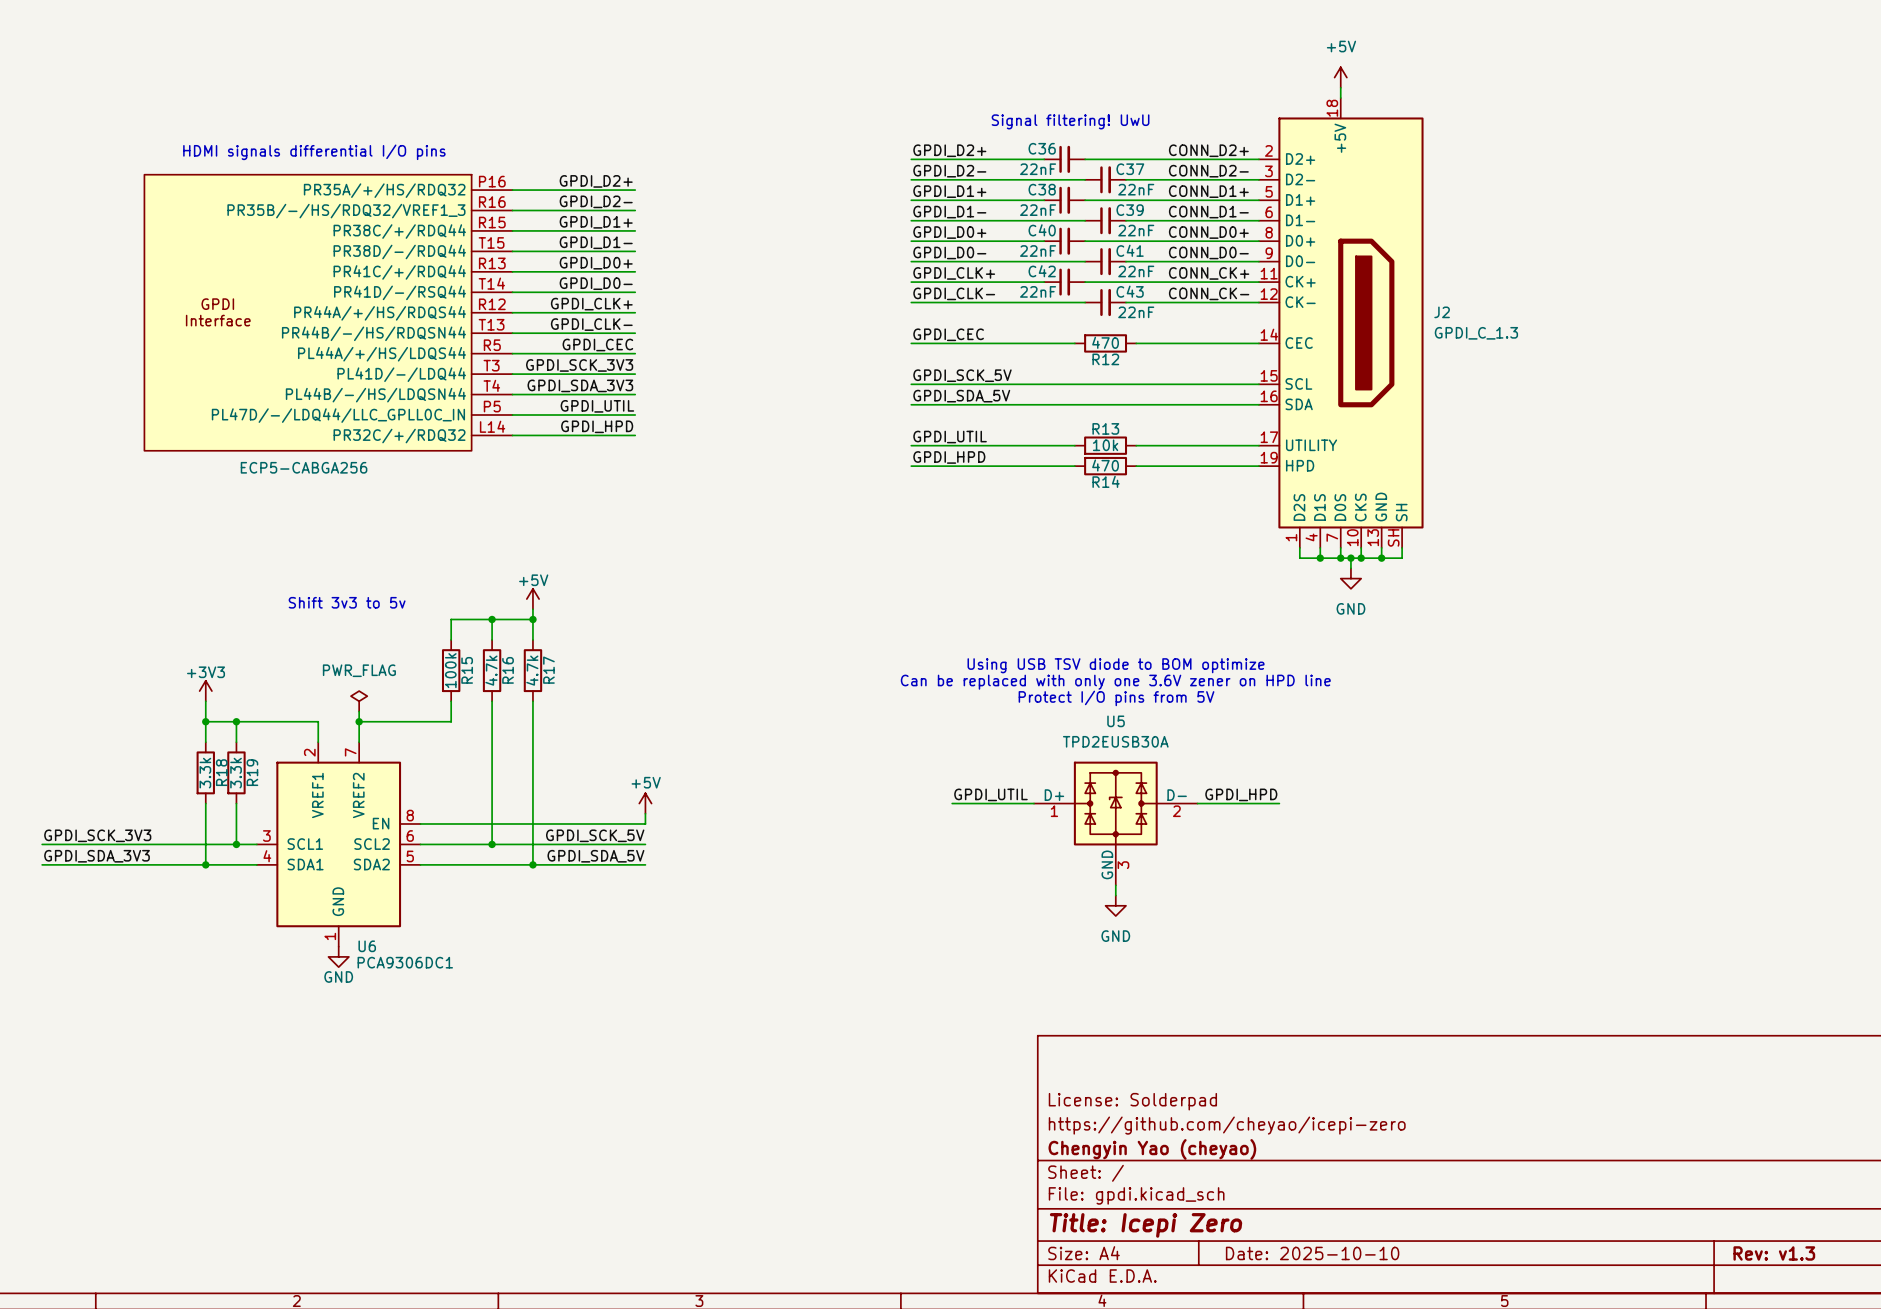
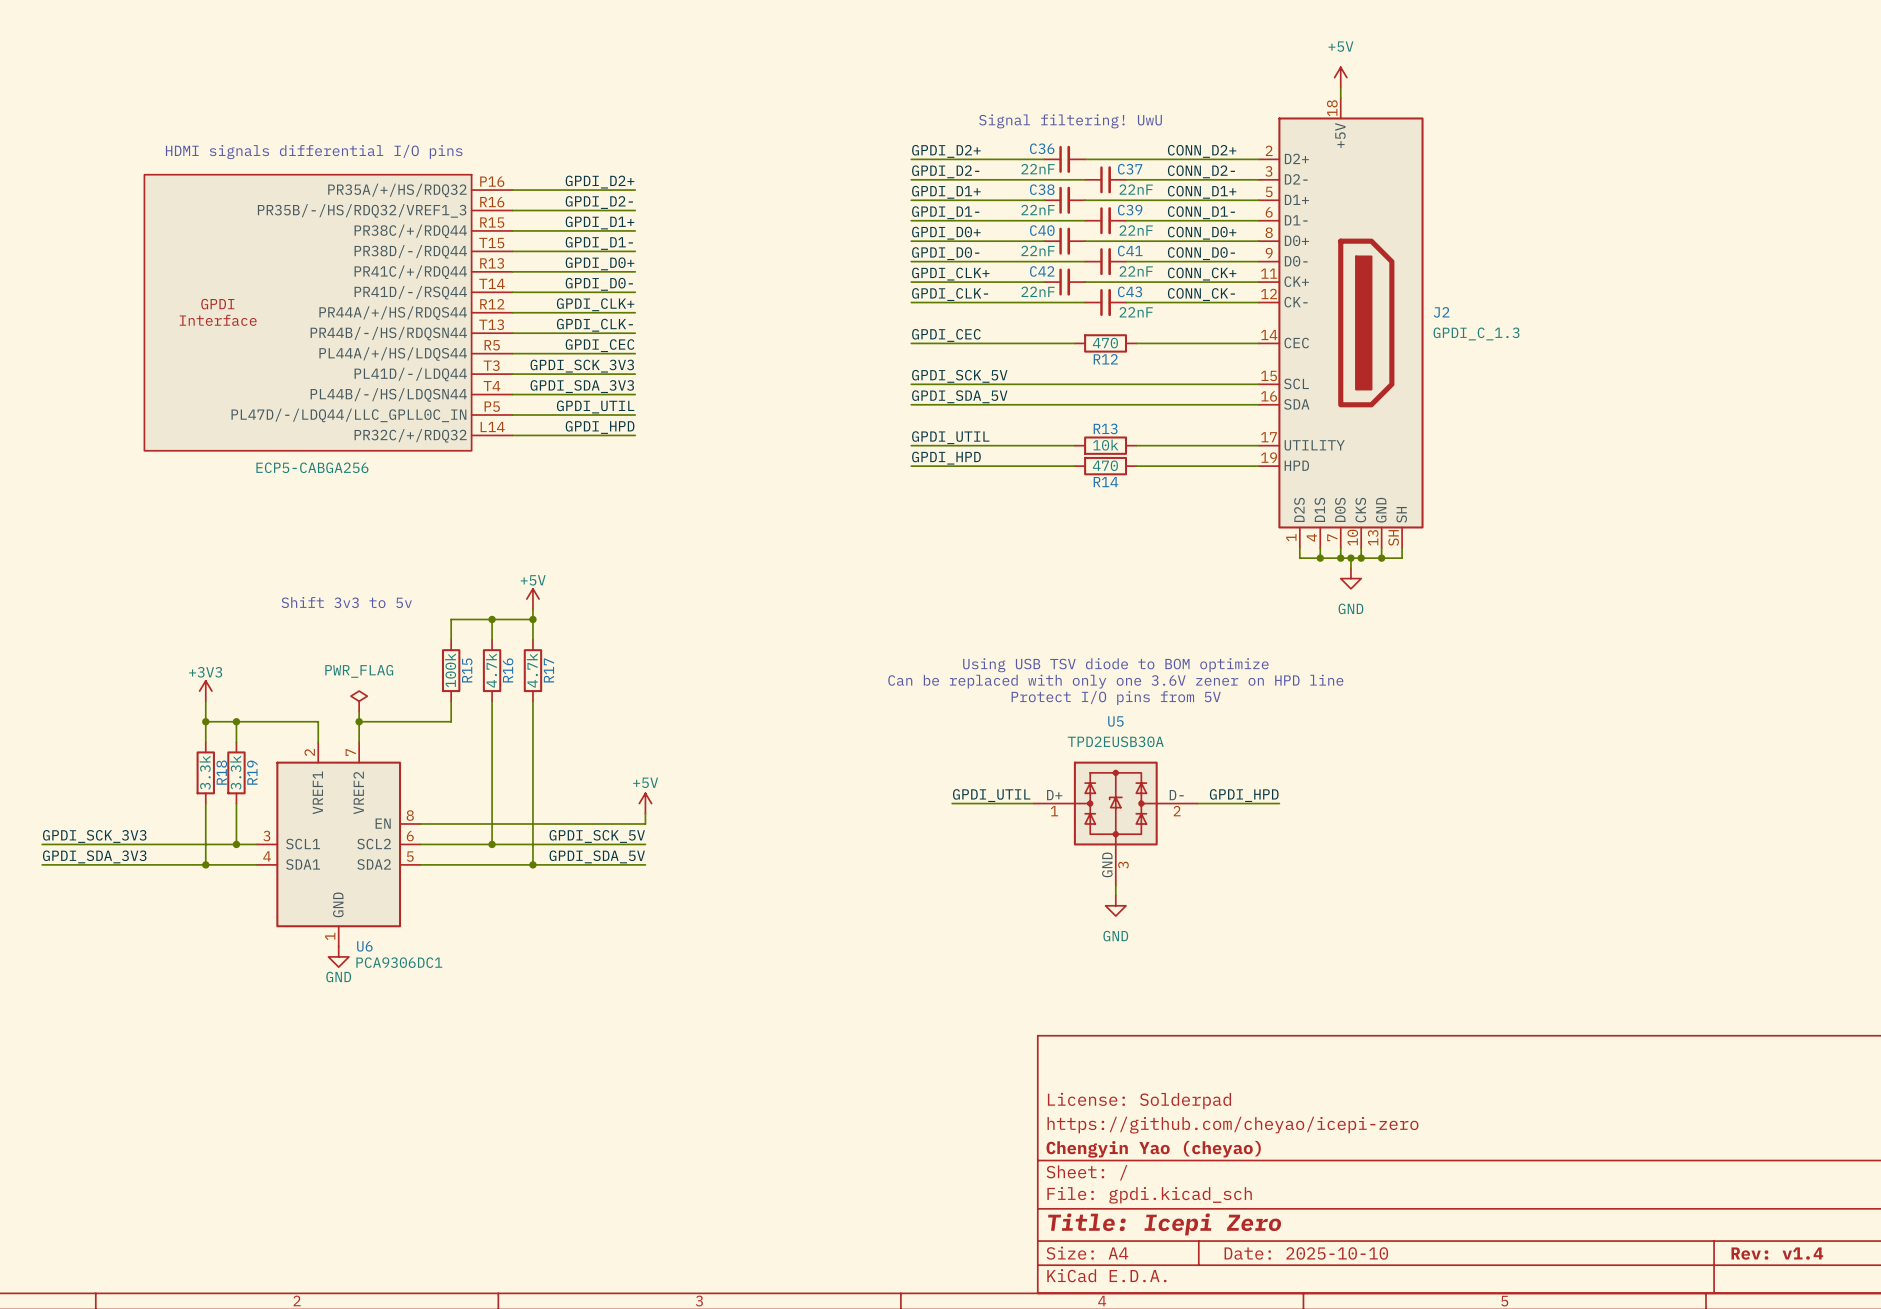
title block: Rev: v1.3 (1774, 1253) -> Rev: v1.4 (1777, 1253)

